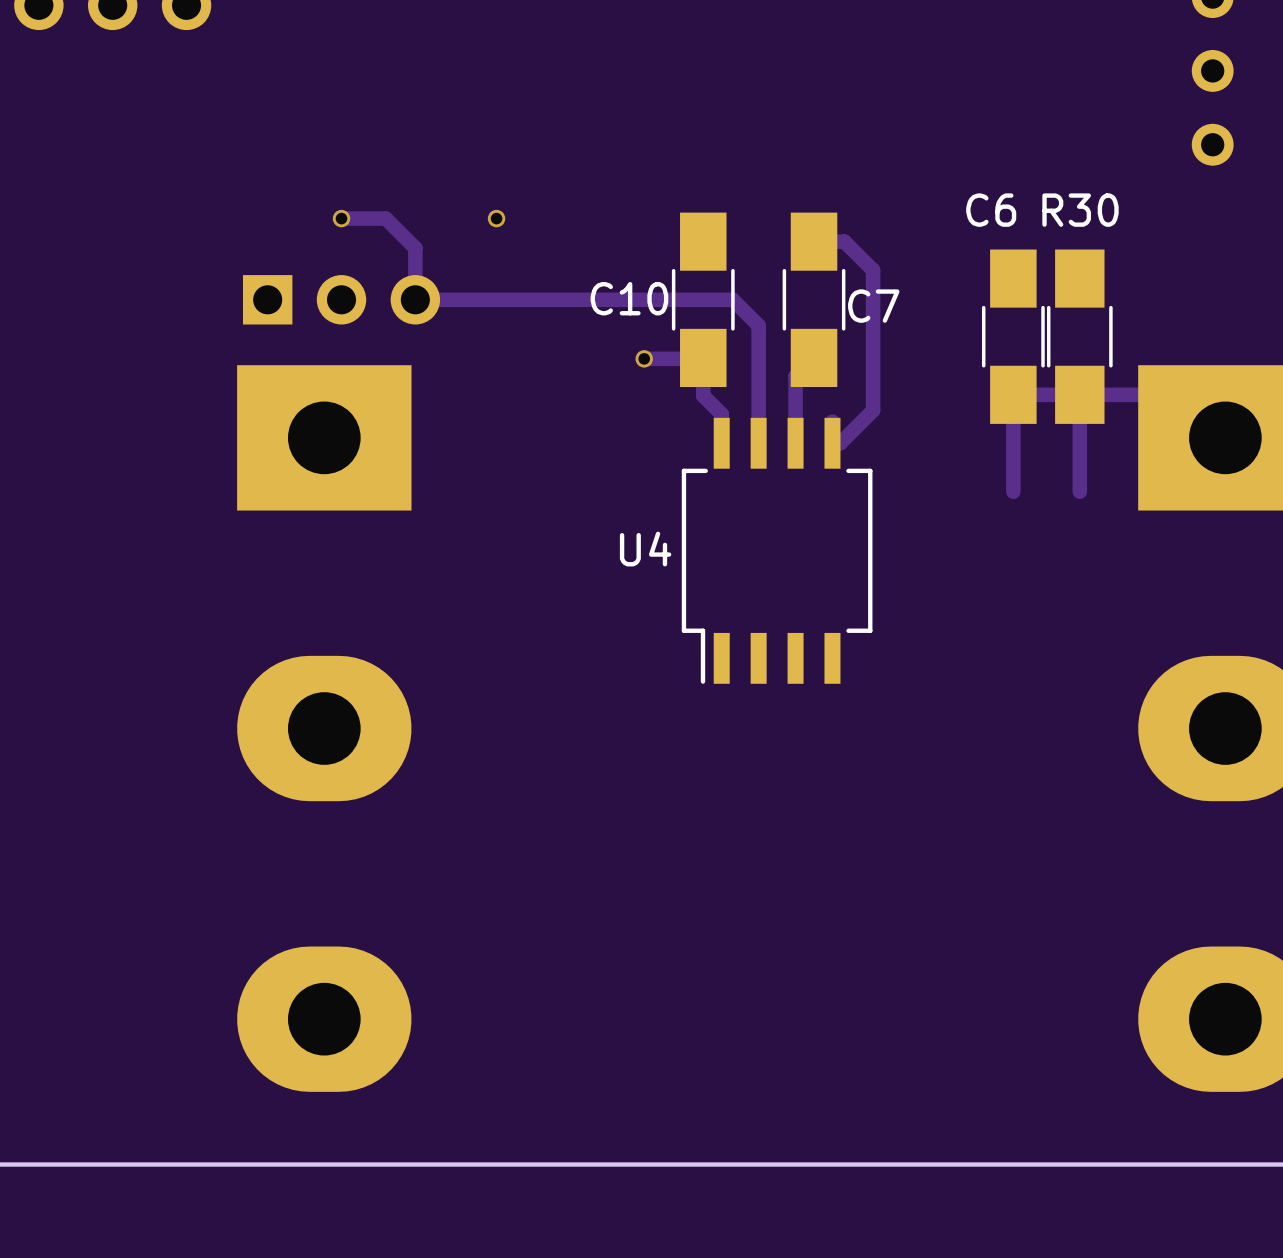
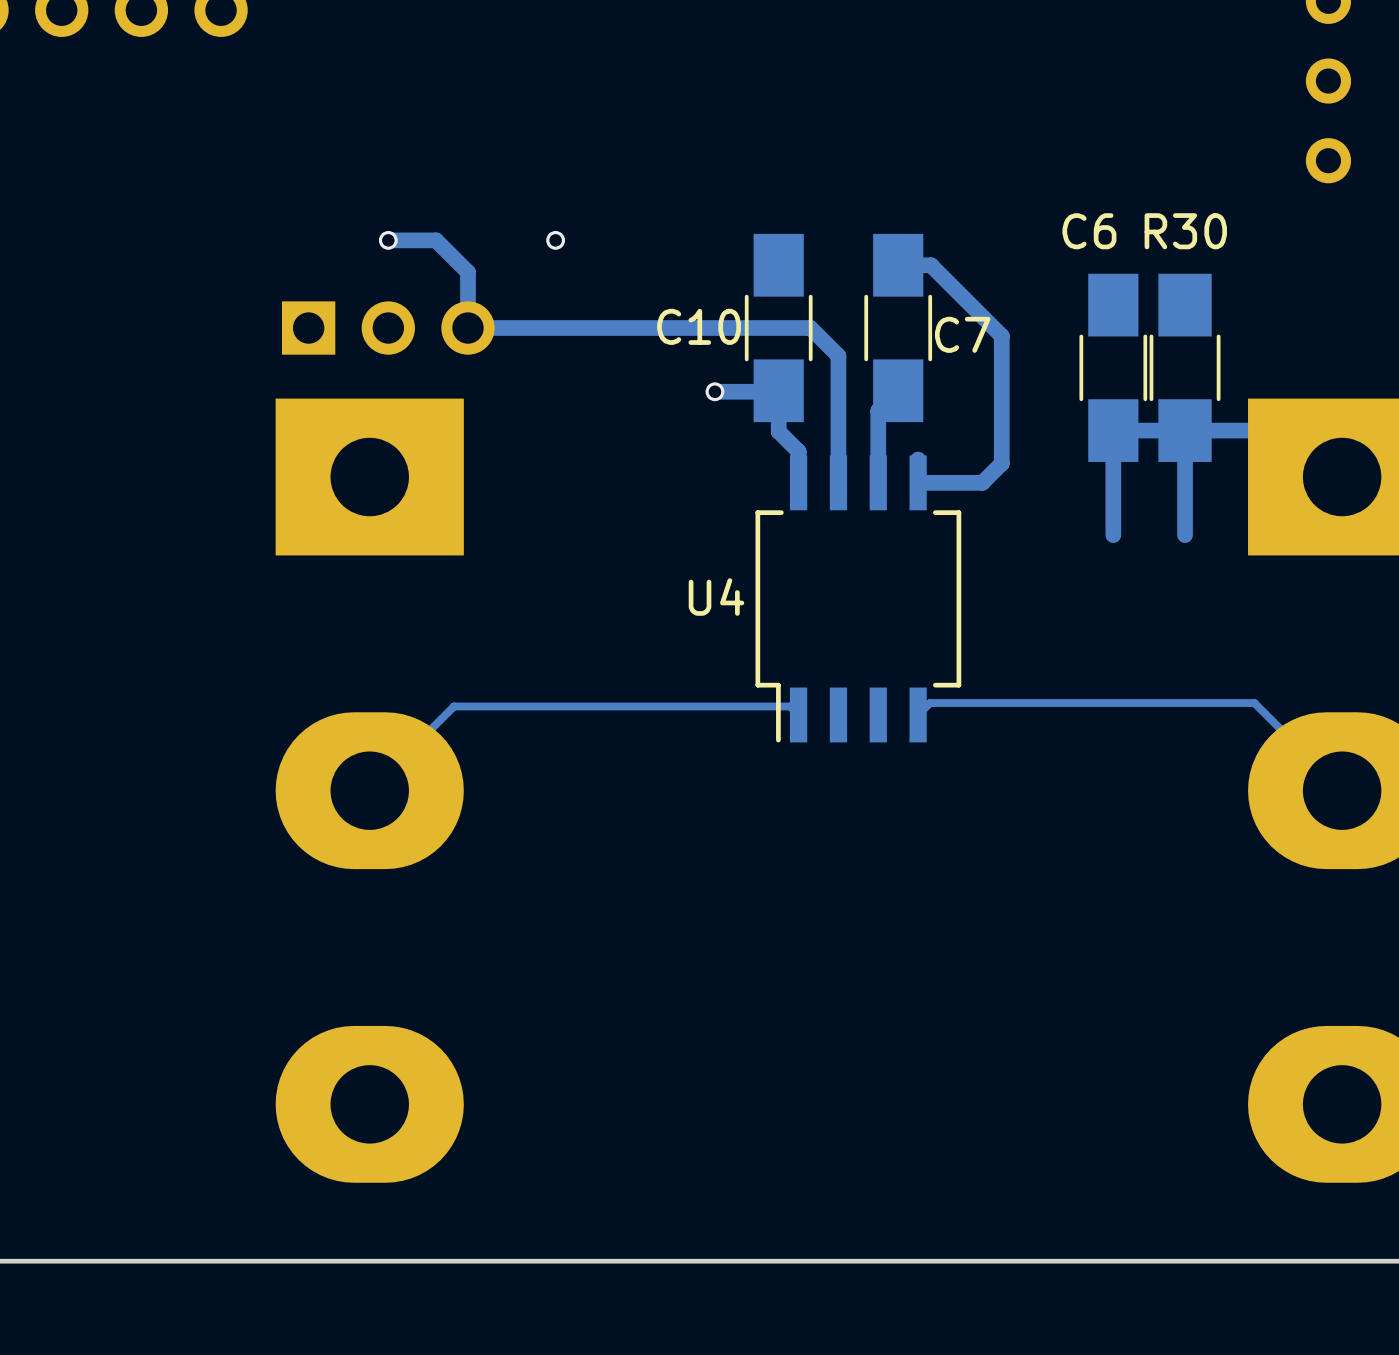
track: (873, 270) (873, 410) (840, 443) -> (961, 296) (1001, 335) (1001, 463) (982, 482) (926, 482)
track: none -> (798, 714) (790, 706) (453, 706) (369, 790)
track: none -> (918, 714) (930, 703) (1254, 703) (1342, 790)

